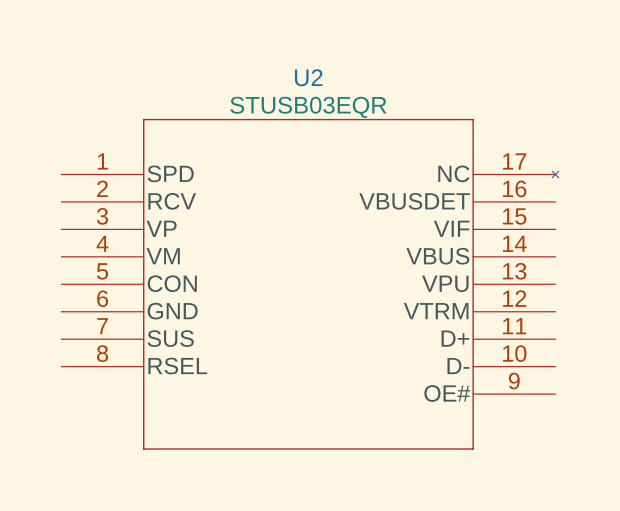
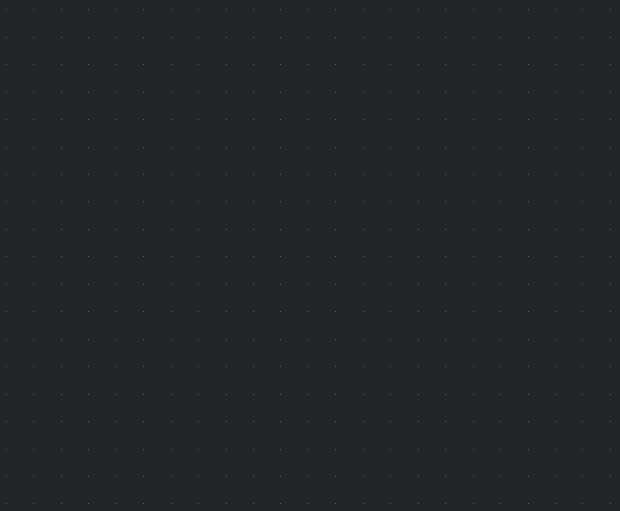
U2: STUSB03EQR (310, 284) -> none

